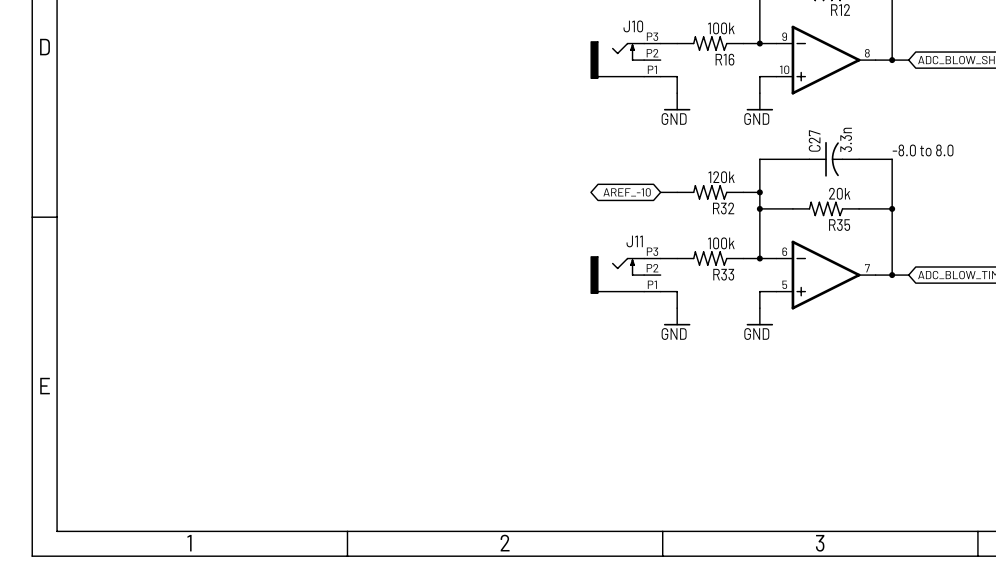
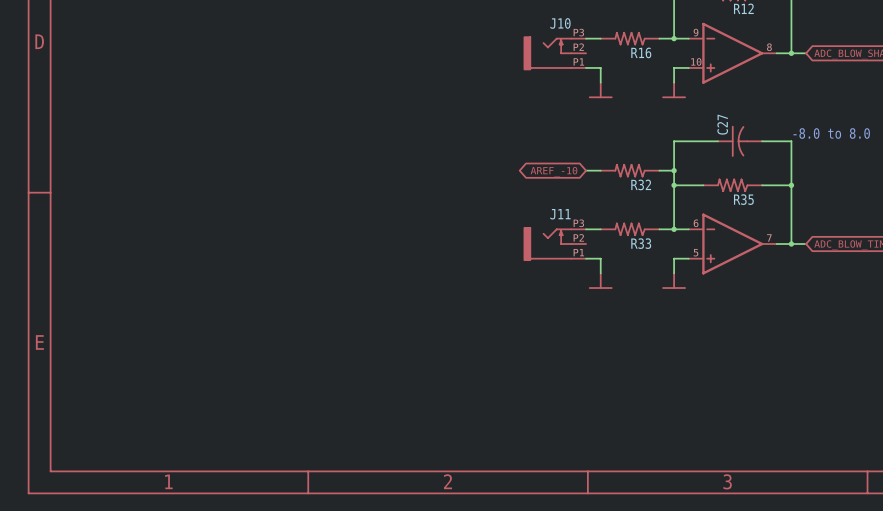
R16 value: 100k (721, 28) -> none
power symbol text: GND (674, 119) -> none
power symbol text: GND (756, 119) -> none
C27 value: 3.3n (846, 139) -> none
R32 value: 120k (721, 177) -> none
R35 value: 20k (839, 193) -> none
R33 value: 100k (721, 243) -> none
power symbol text: GND (674, 334) -> none
power symbol text: GND (756, 334) -> none

